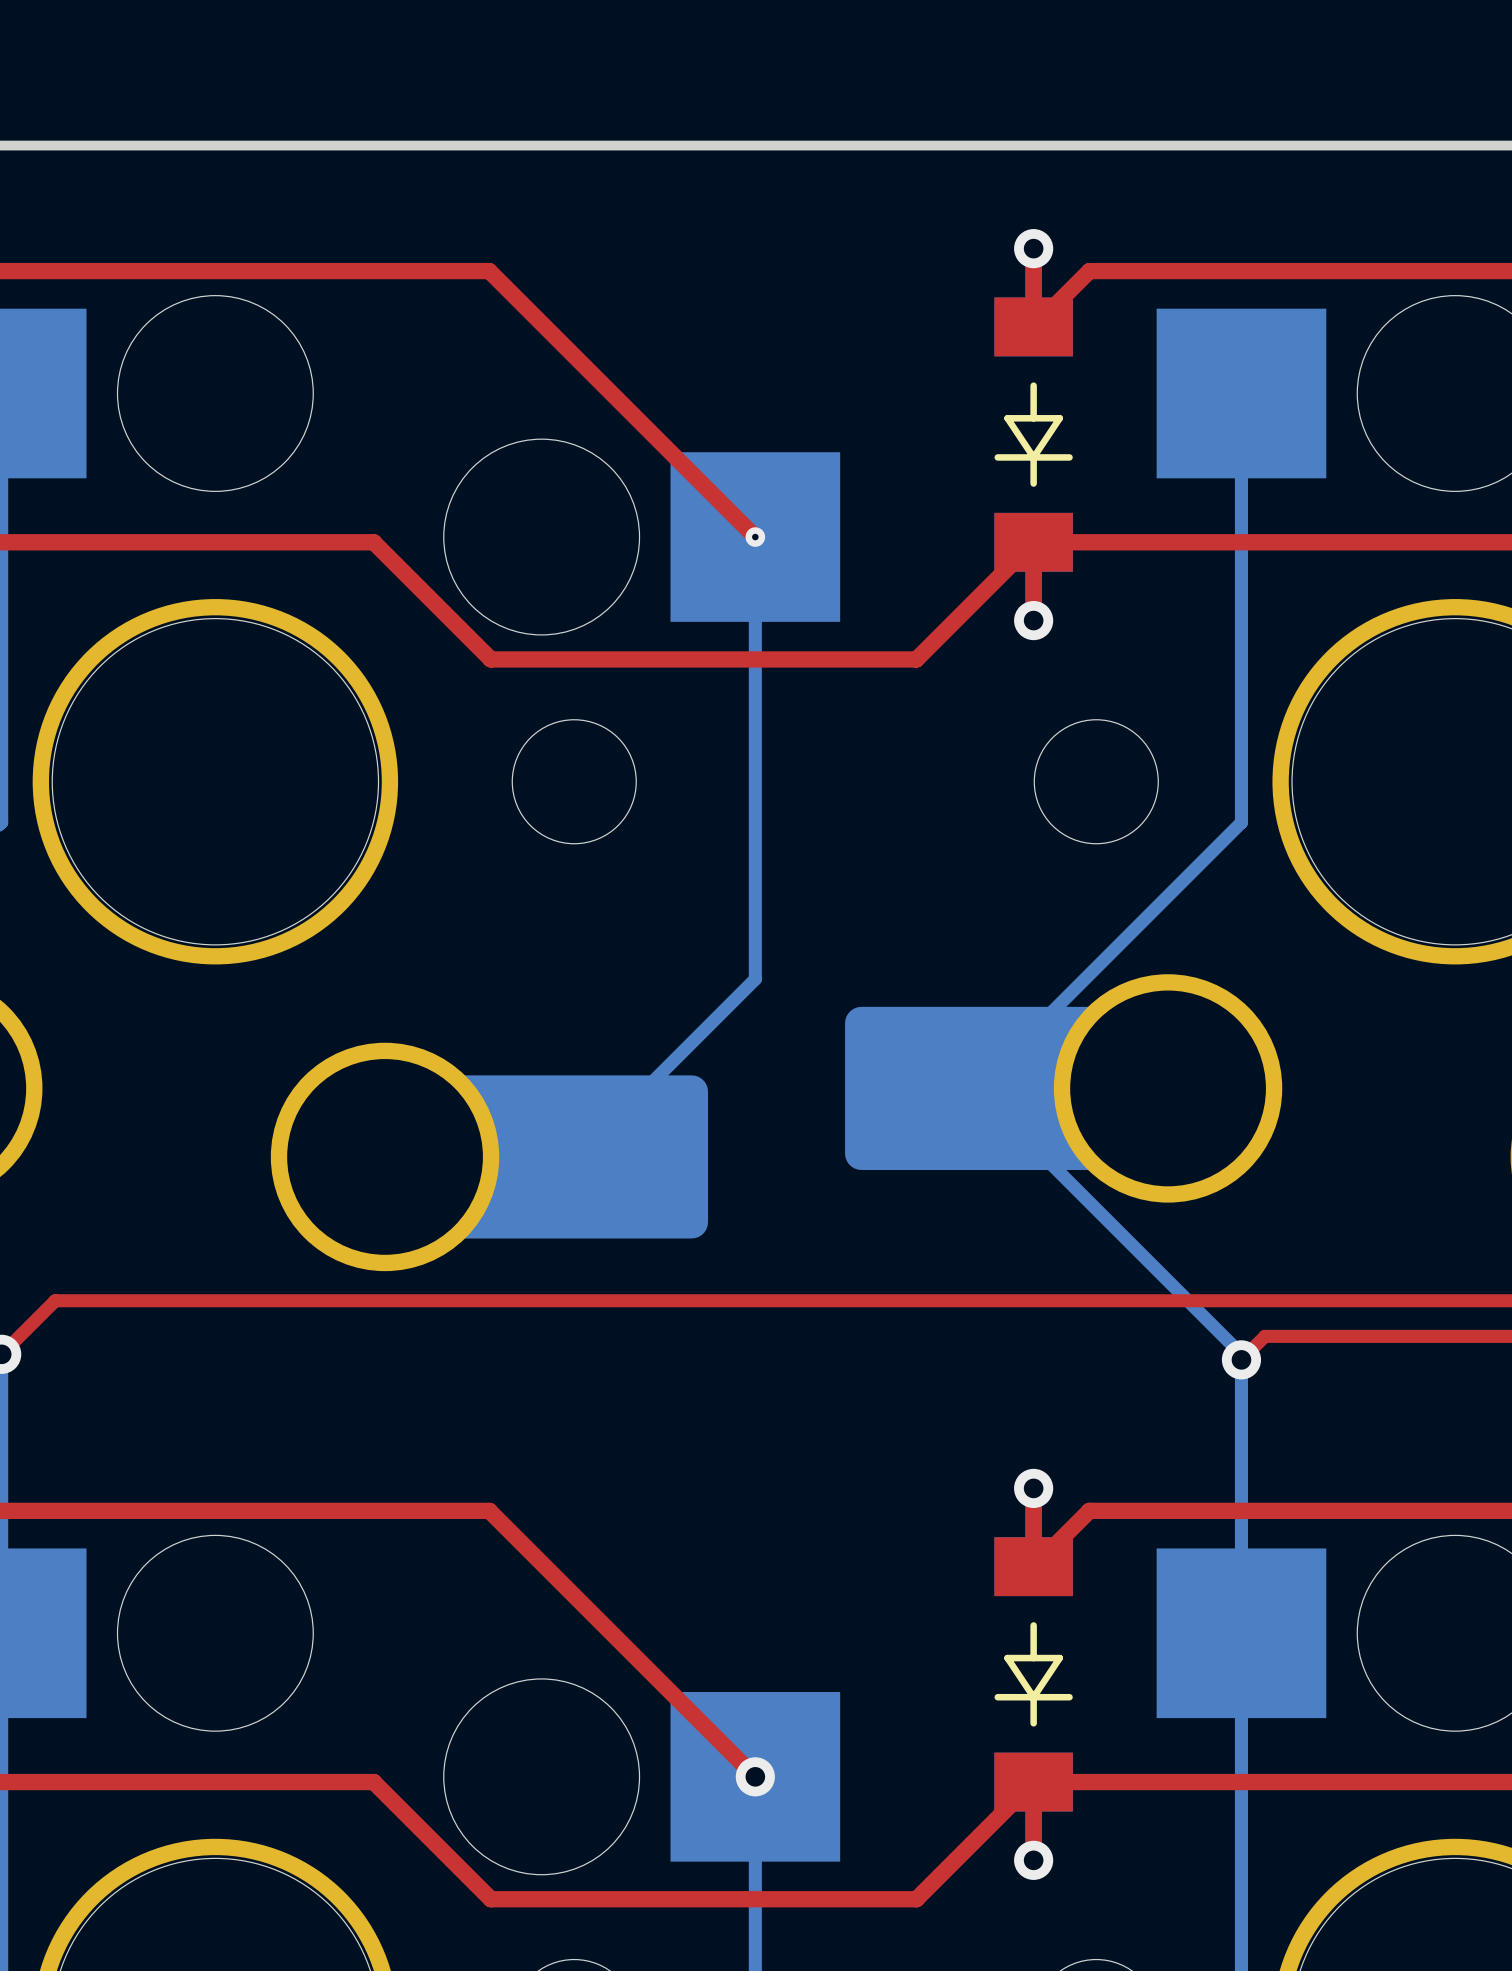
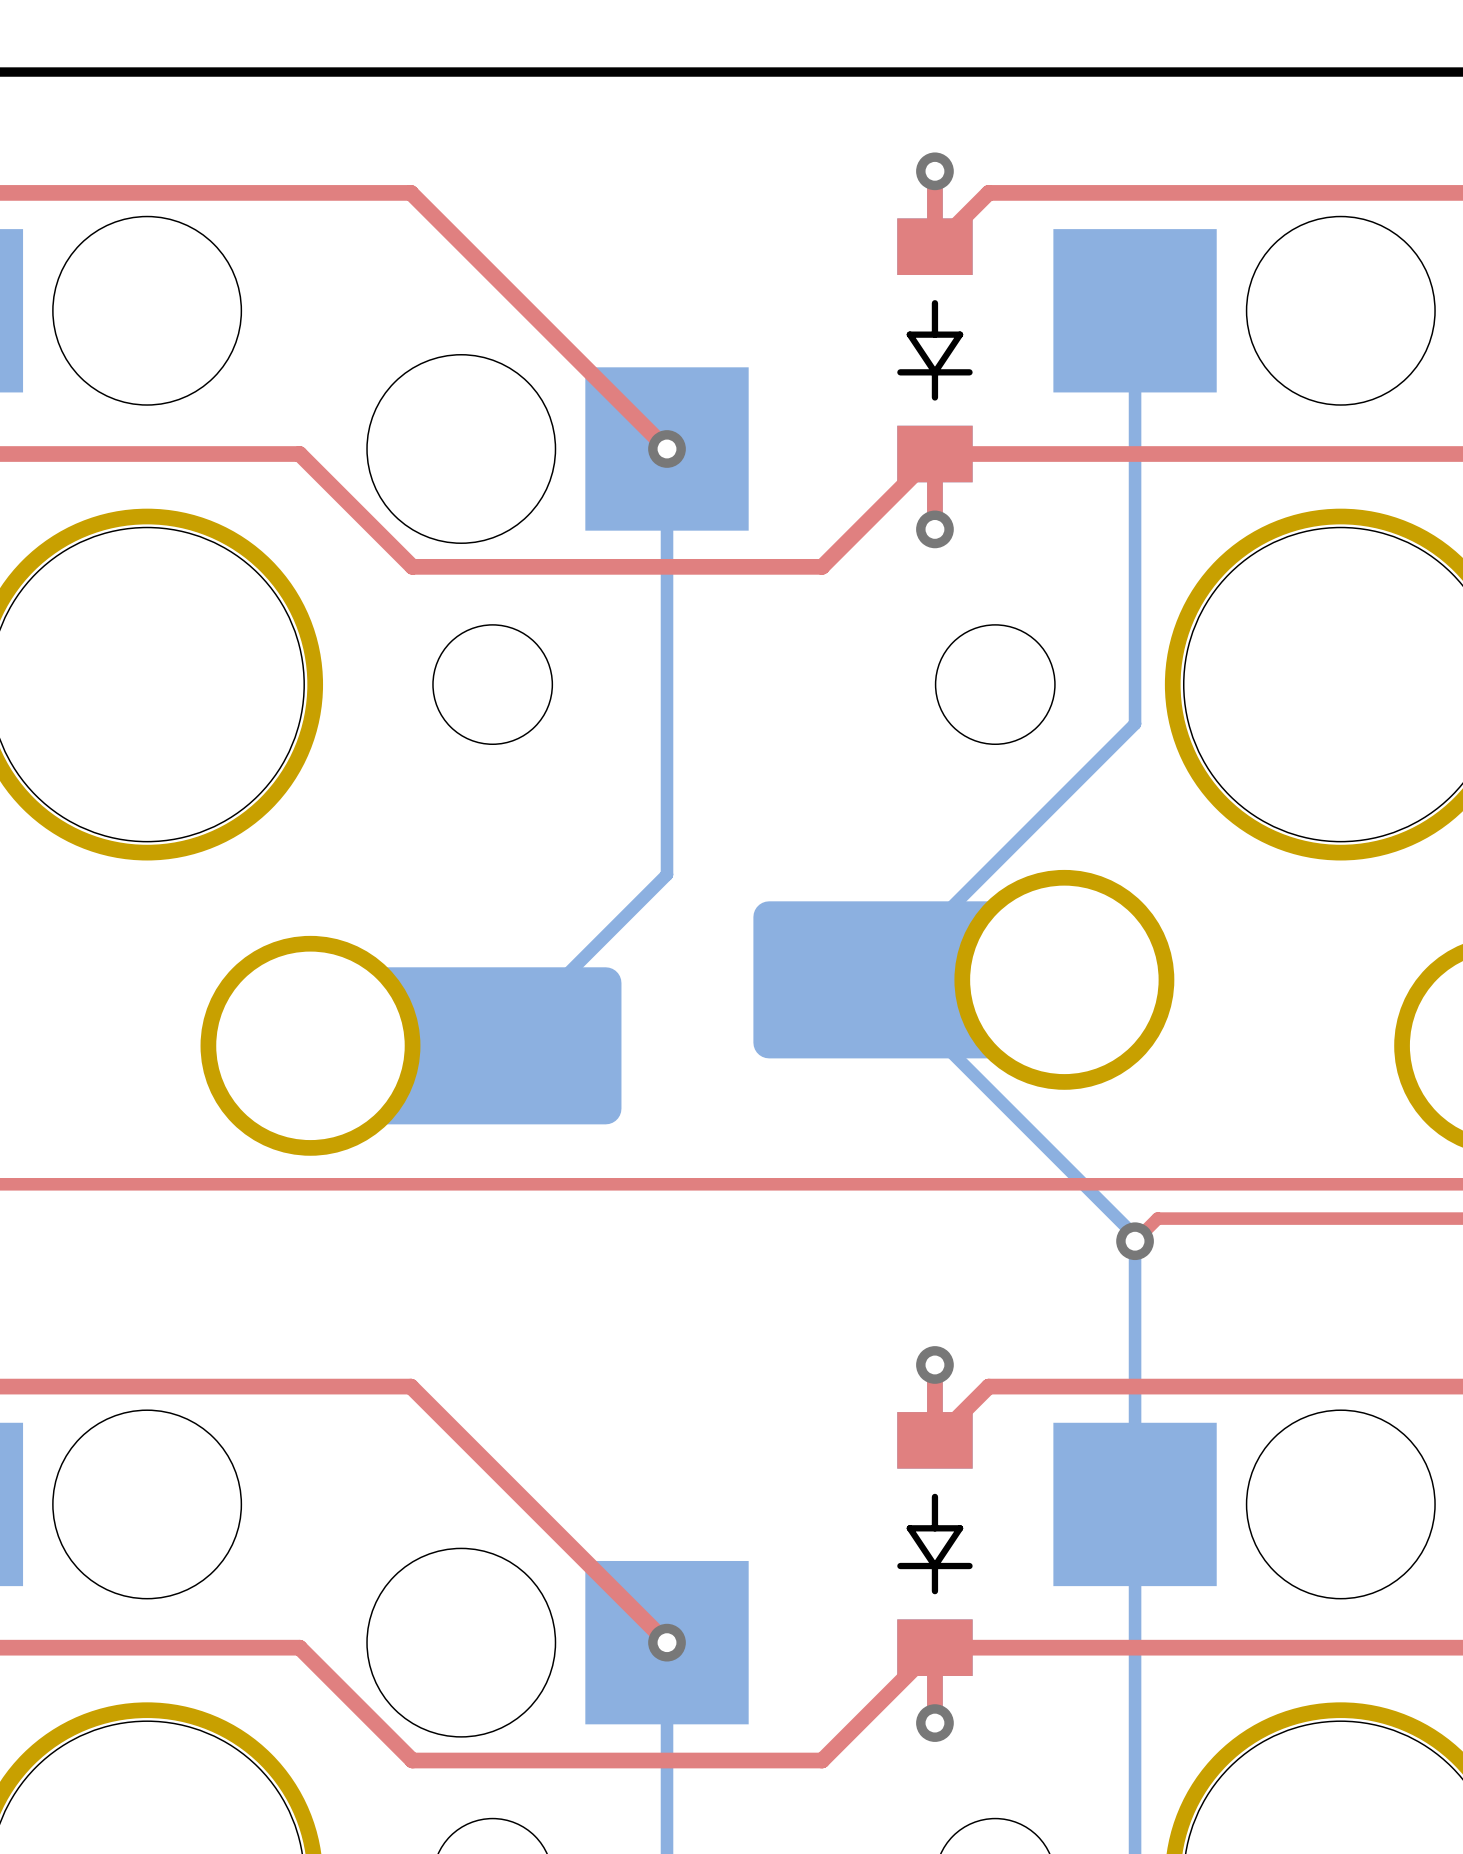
via size: [745, 527, 766, 547] -> [648, 430, 686, 468]

